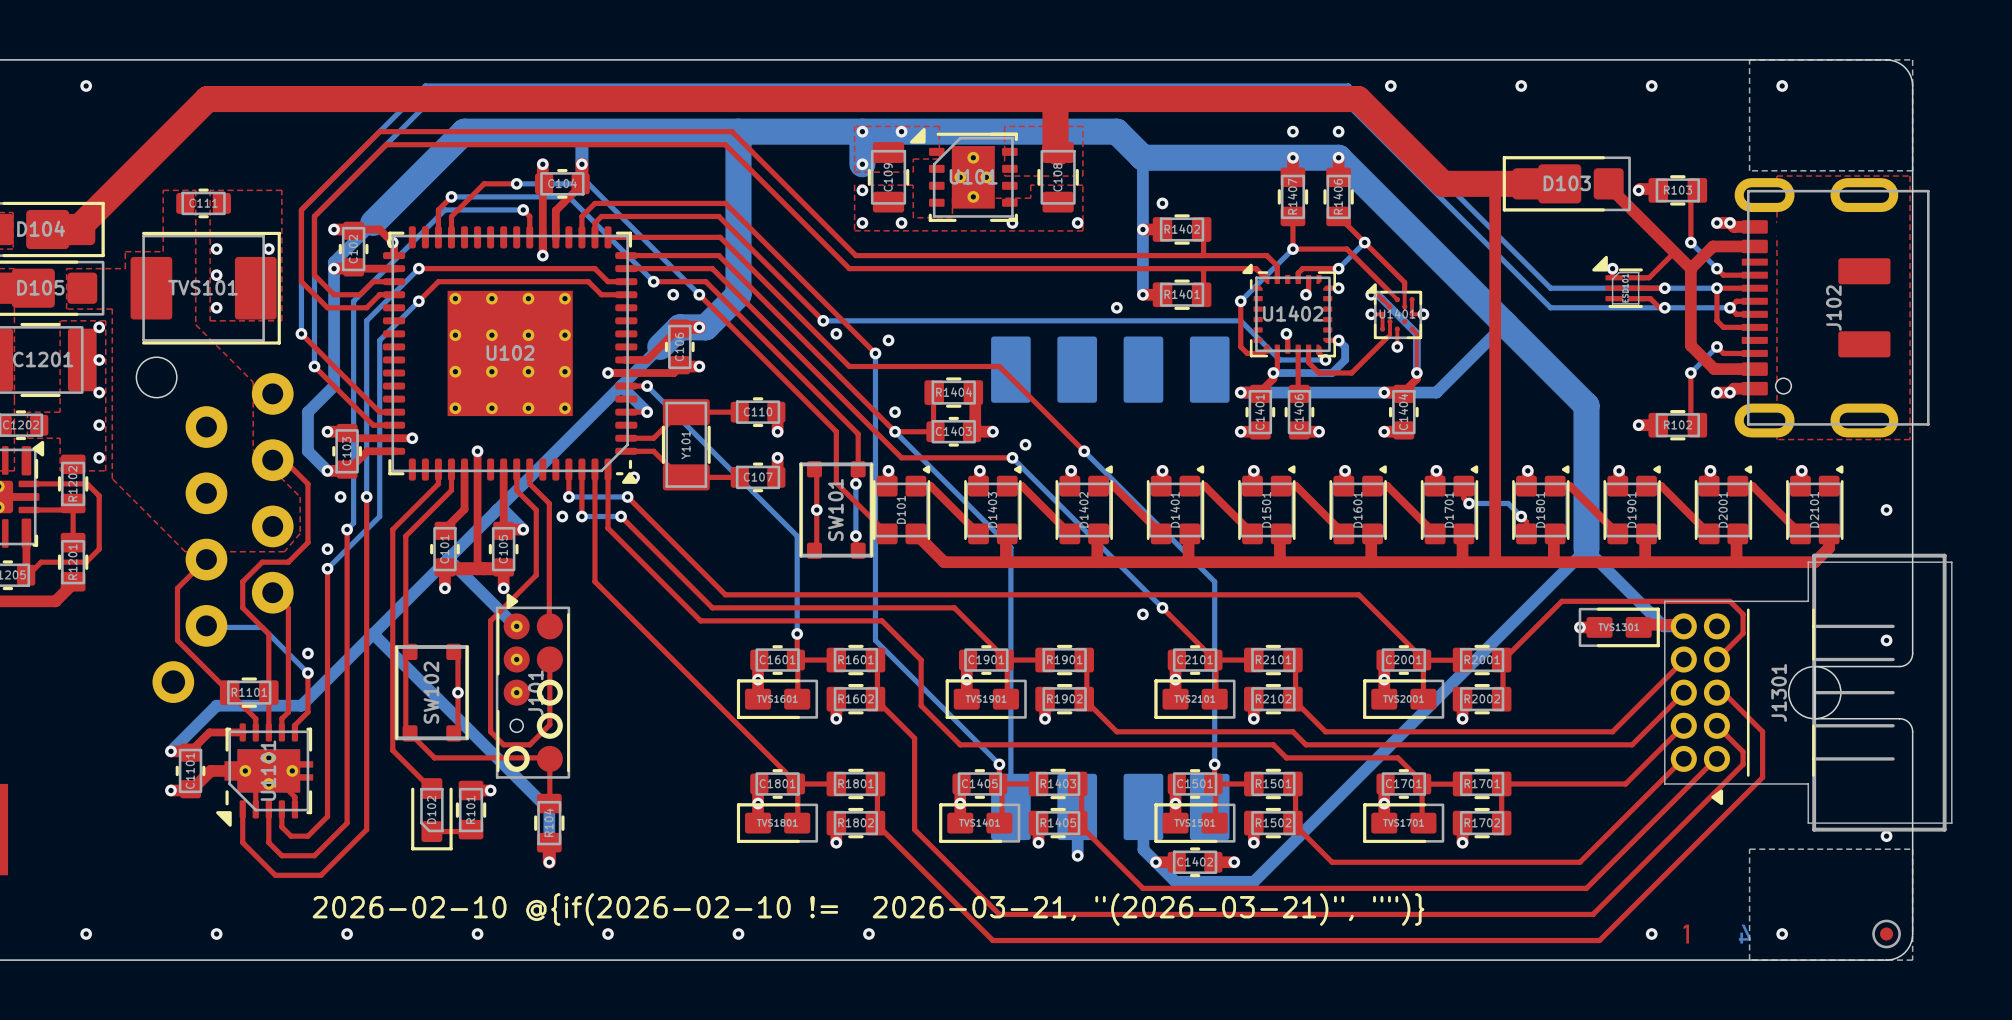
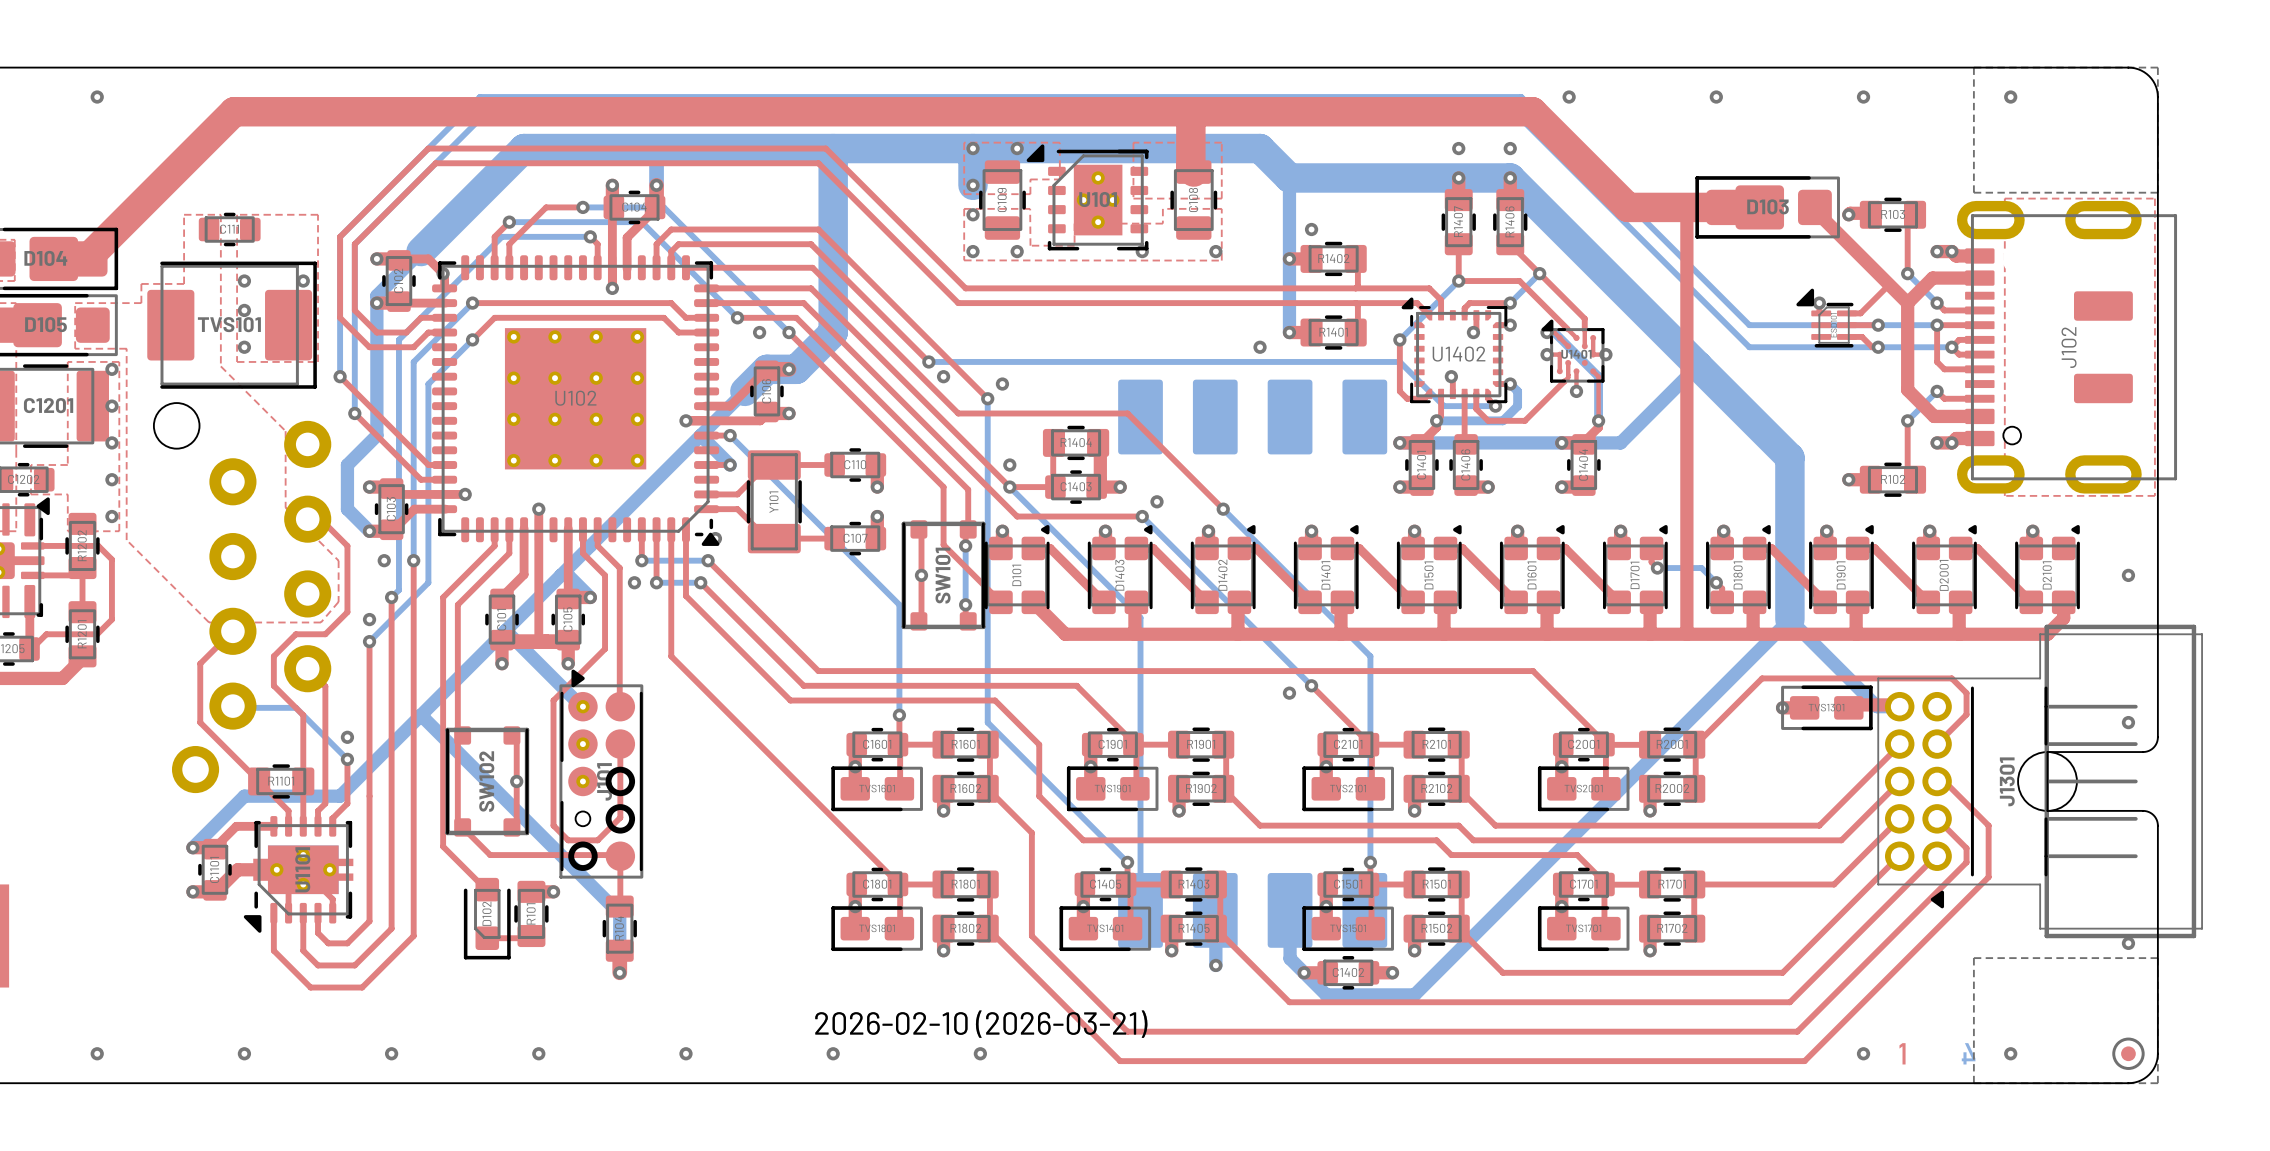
drawing shape: [312, 893, 1425, 926] -> [815, 1010, 1148, 1038]

